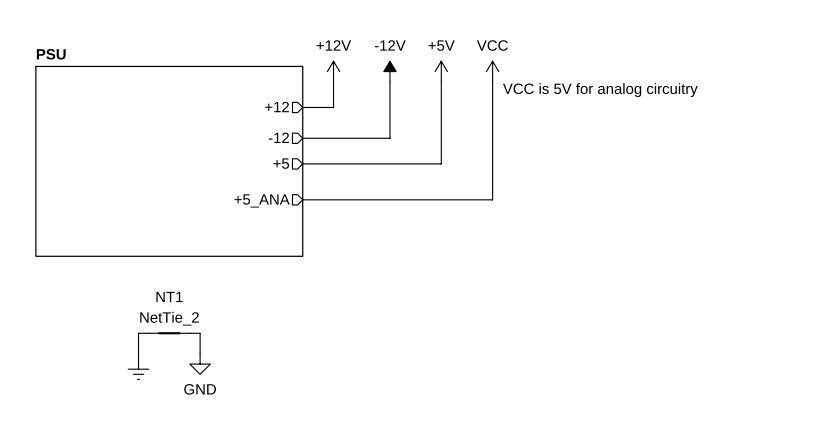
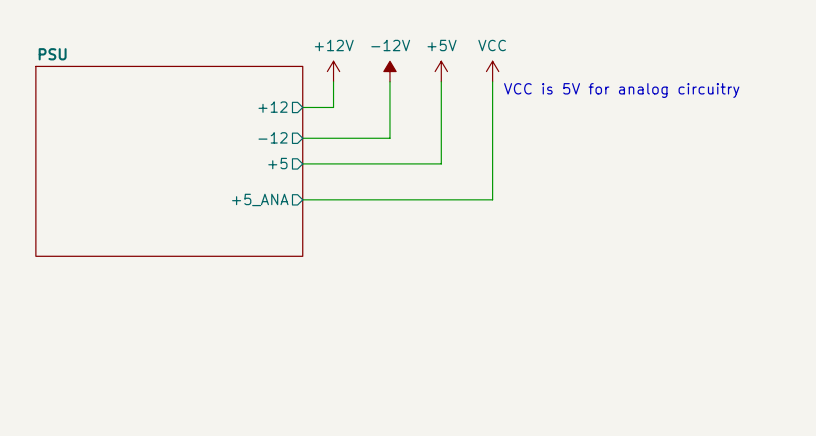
wire: (148, 333) (138, 333) (138, 358) -> none
NT1: NetTie_2 (169, 333) -> none
wire: (189, 333) (200, 333) (200, 353) -> none
power symbol: GND (200, 364) -> none
power symbol: (138, 369) -> none

